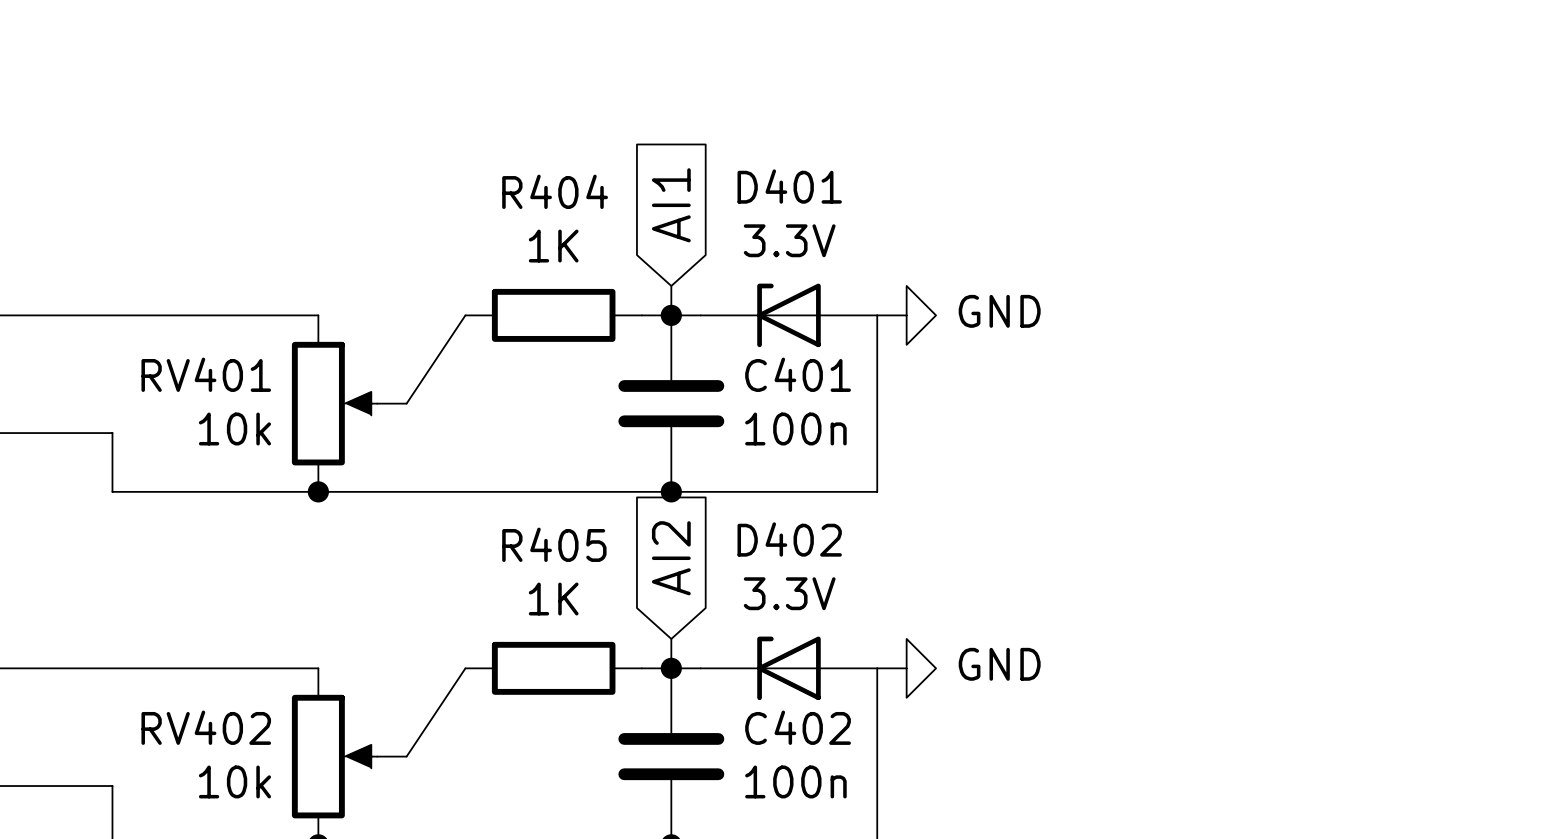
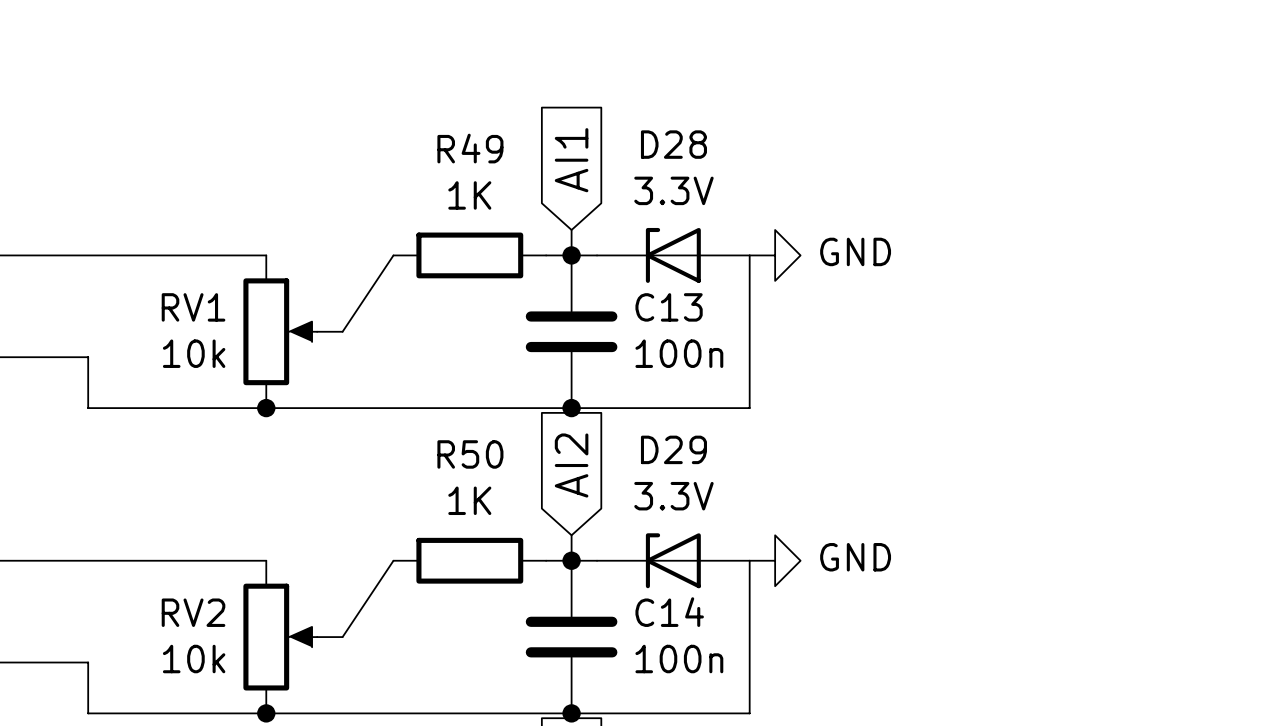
D401 name: D401 (789, 186) -> D28 (673, 144)
R404 name: R404 (555, 191) -> R49 (470, 148)
RV401 name: RV401 (206, 374) -> RV1 (193, 307)
C401 name: C401 (798, 374) -> C13 (669, 307)
D402 name: D402 (789, 539) -> D29 (673, 449)
R405 name: R405 (554, 544) -> R50 (470, 454)
RV402 name: RV402 (206, 727) -> RV2 (193, 612)
C402 name: C402 (798, 727) -> C14 (669, 612)

